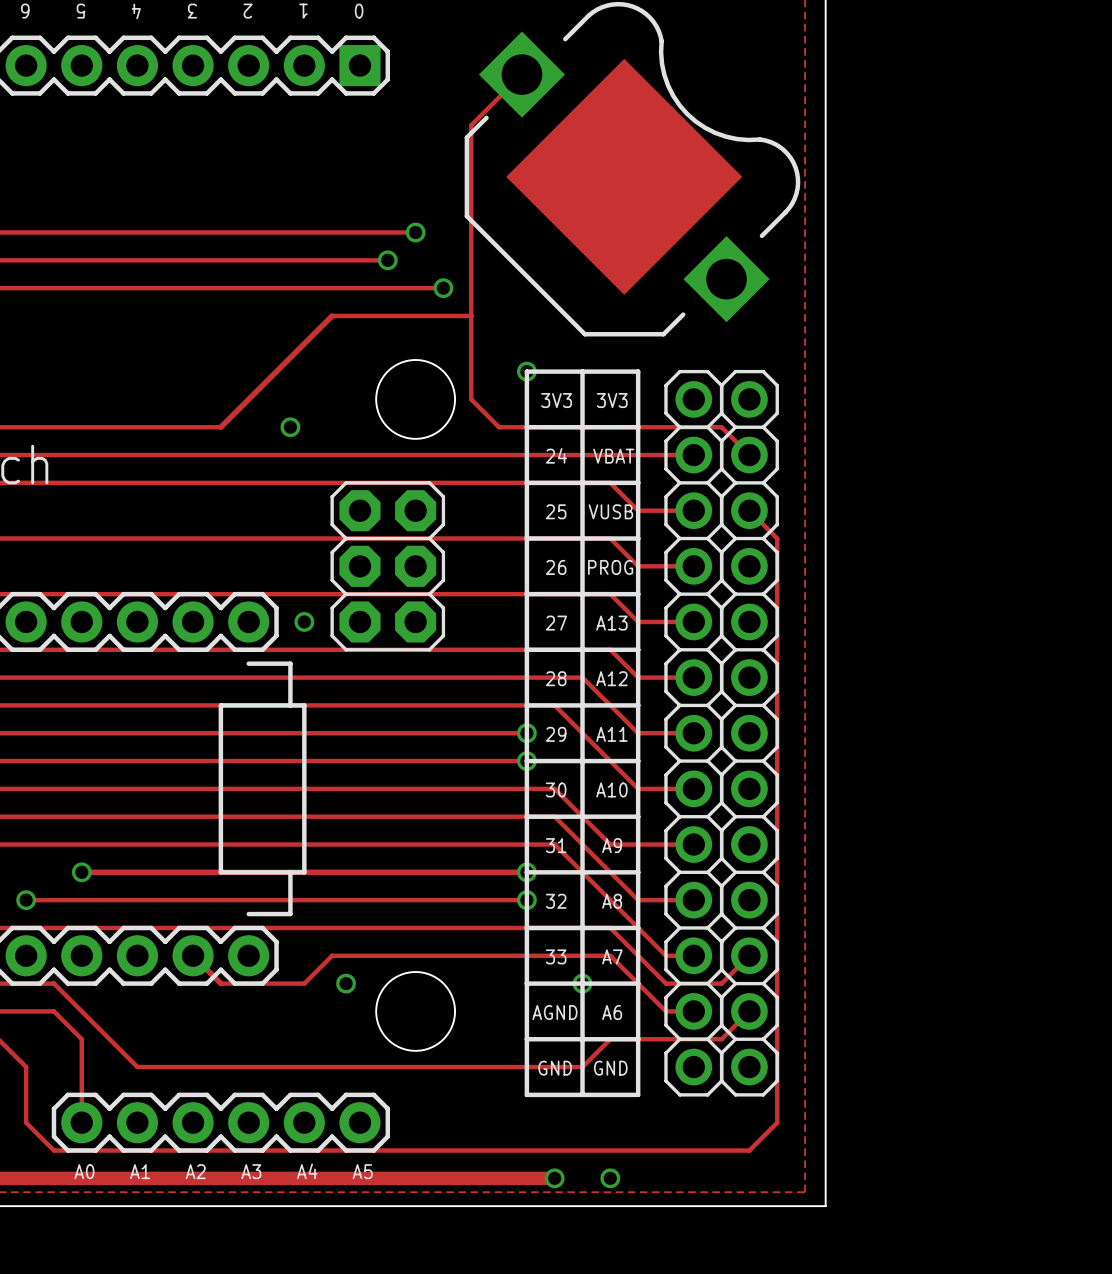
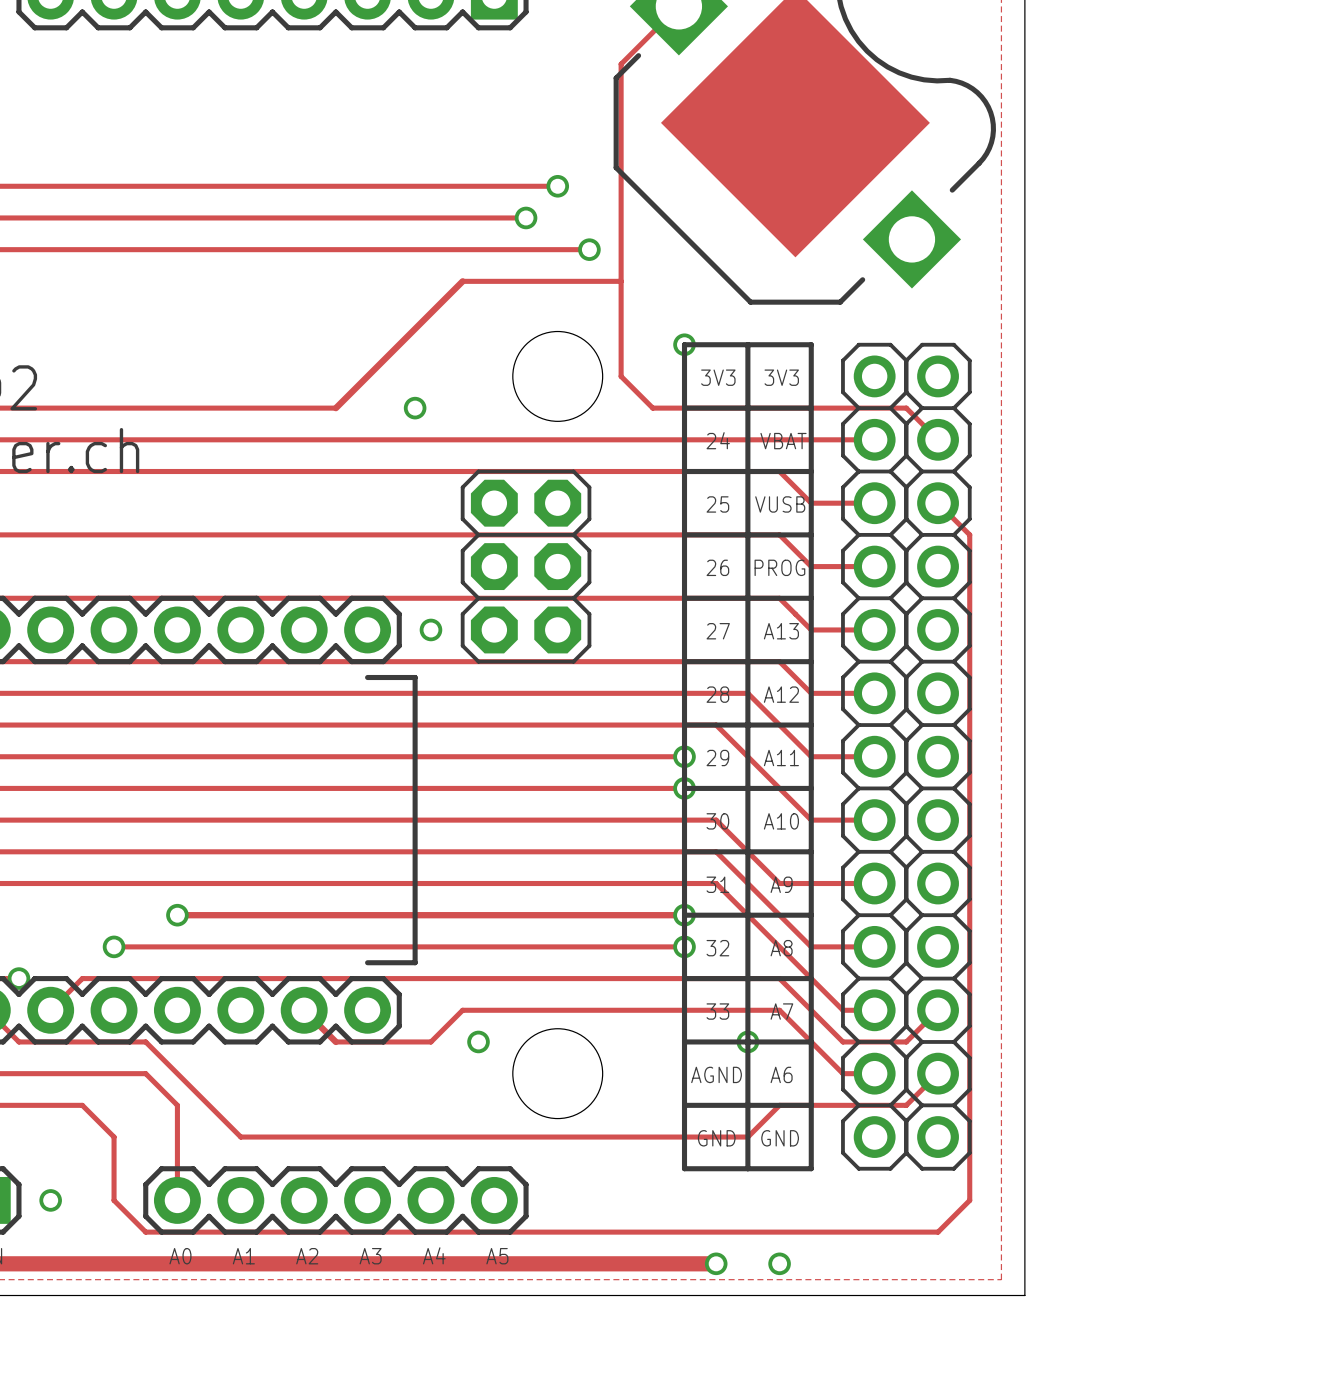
line: (220, 705) (304, 705) (304, 872) (220, 872) (220, 705) -> none
line: none -> (415, 725) (415, 915)

